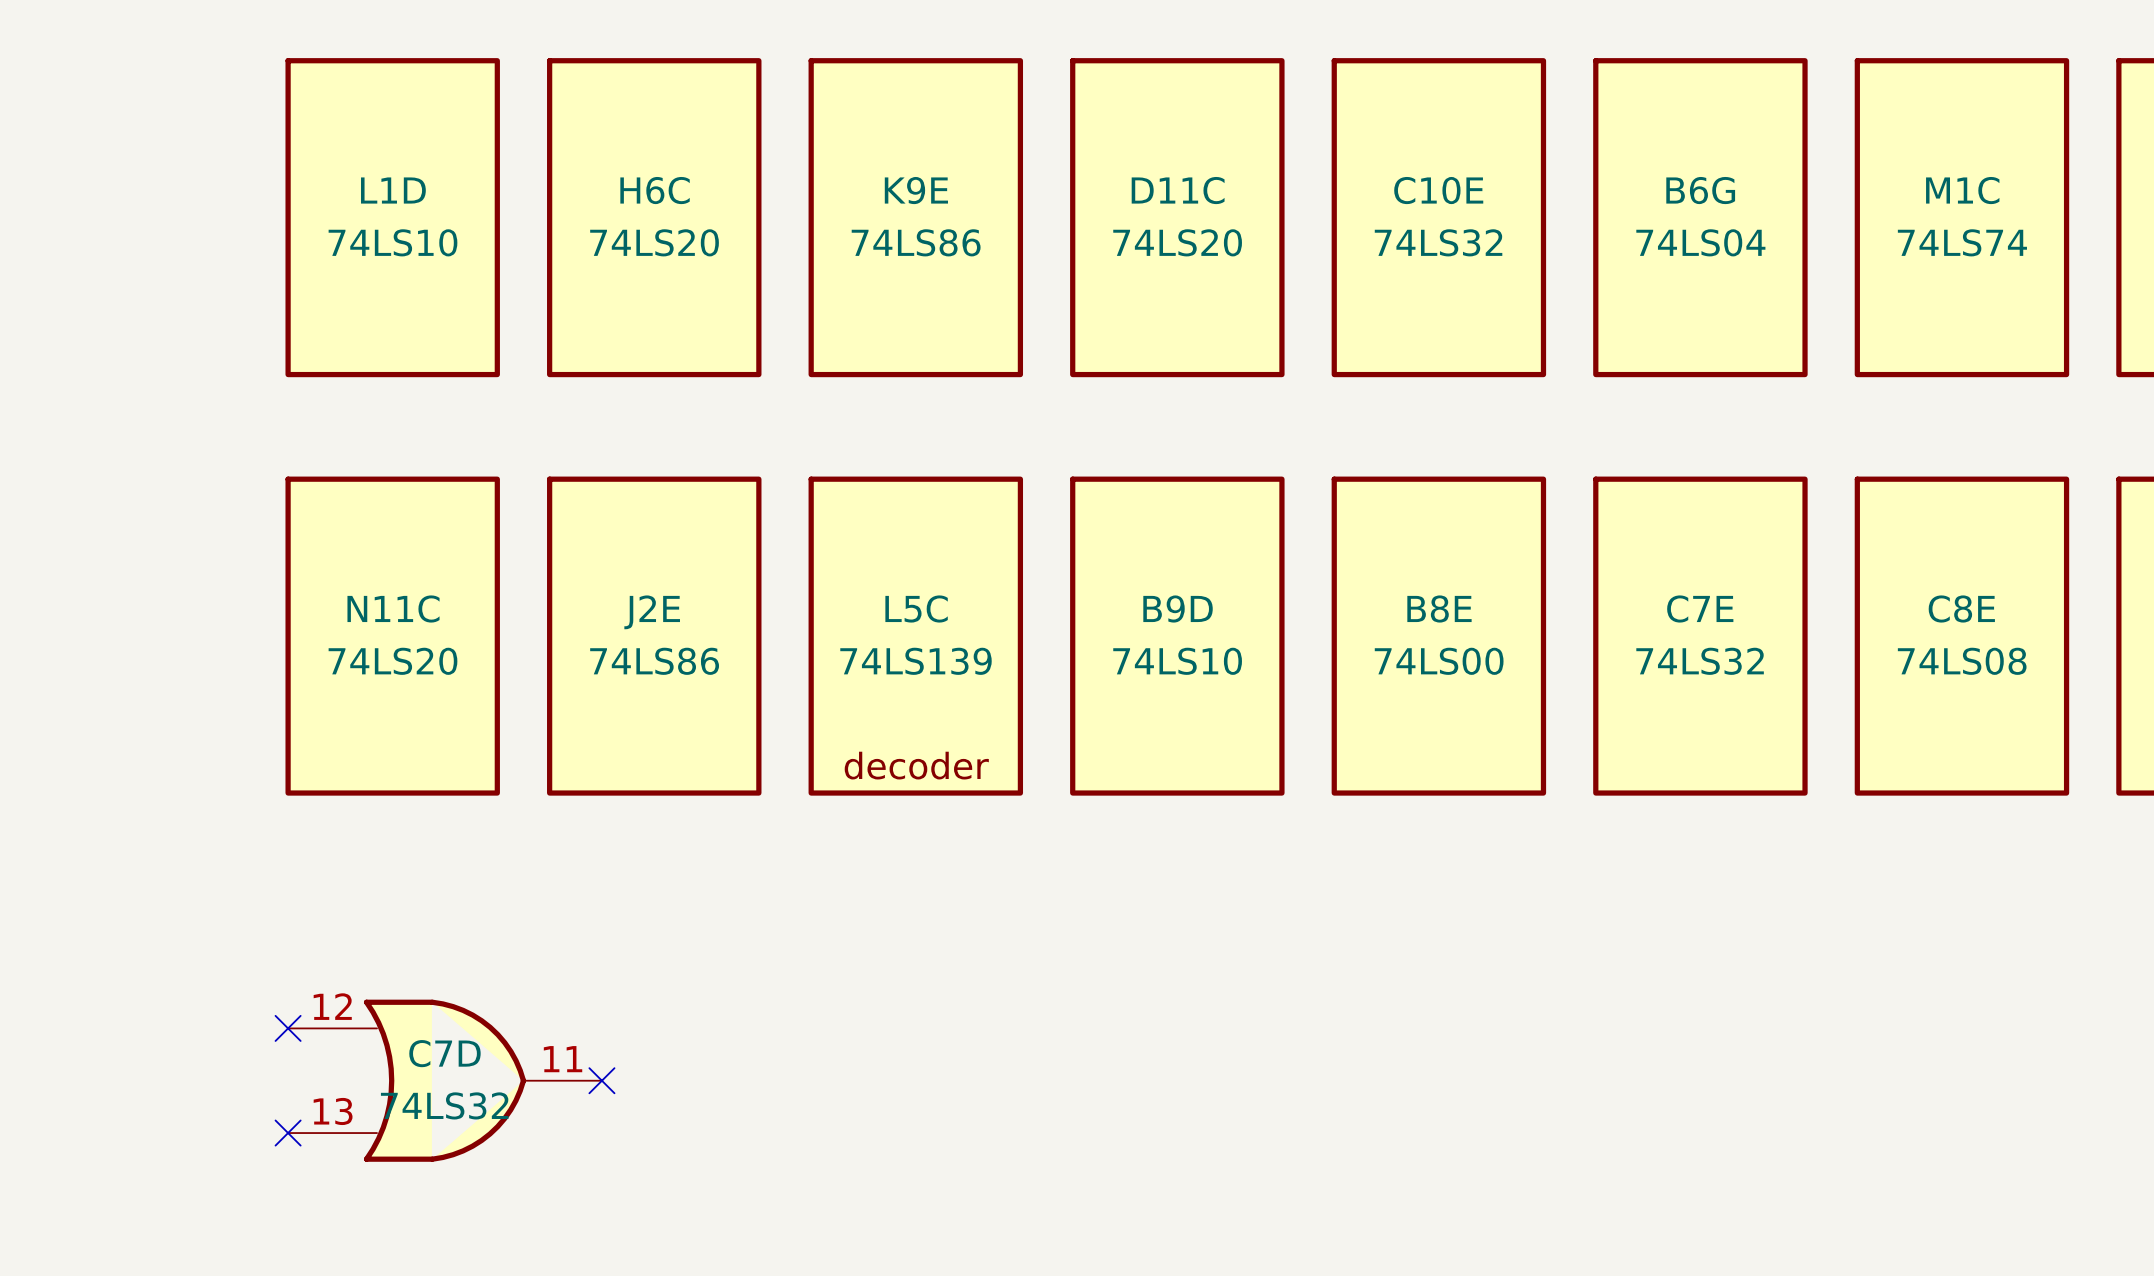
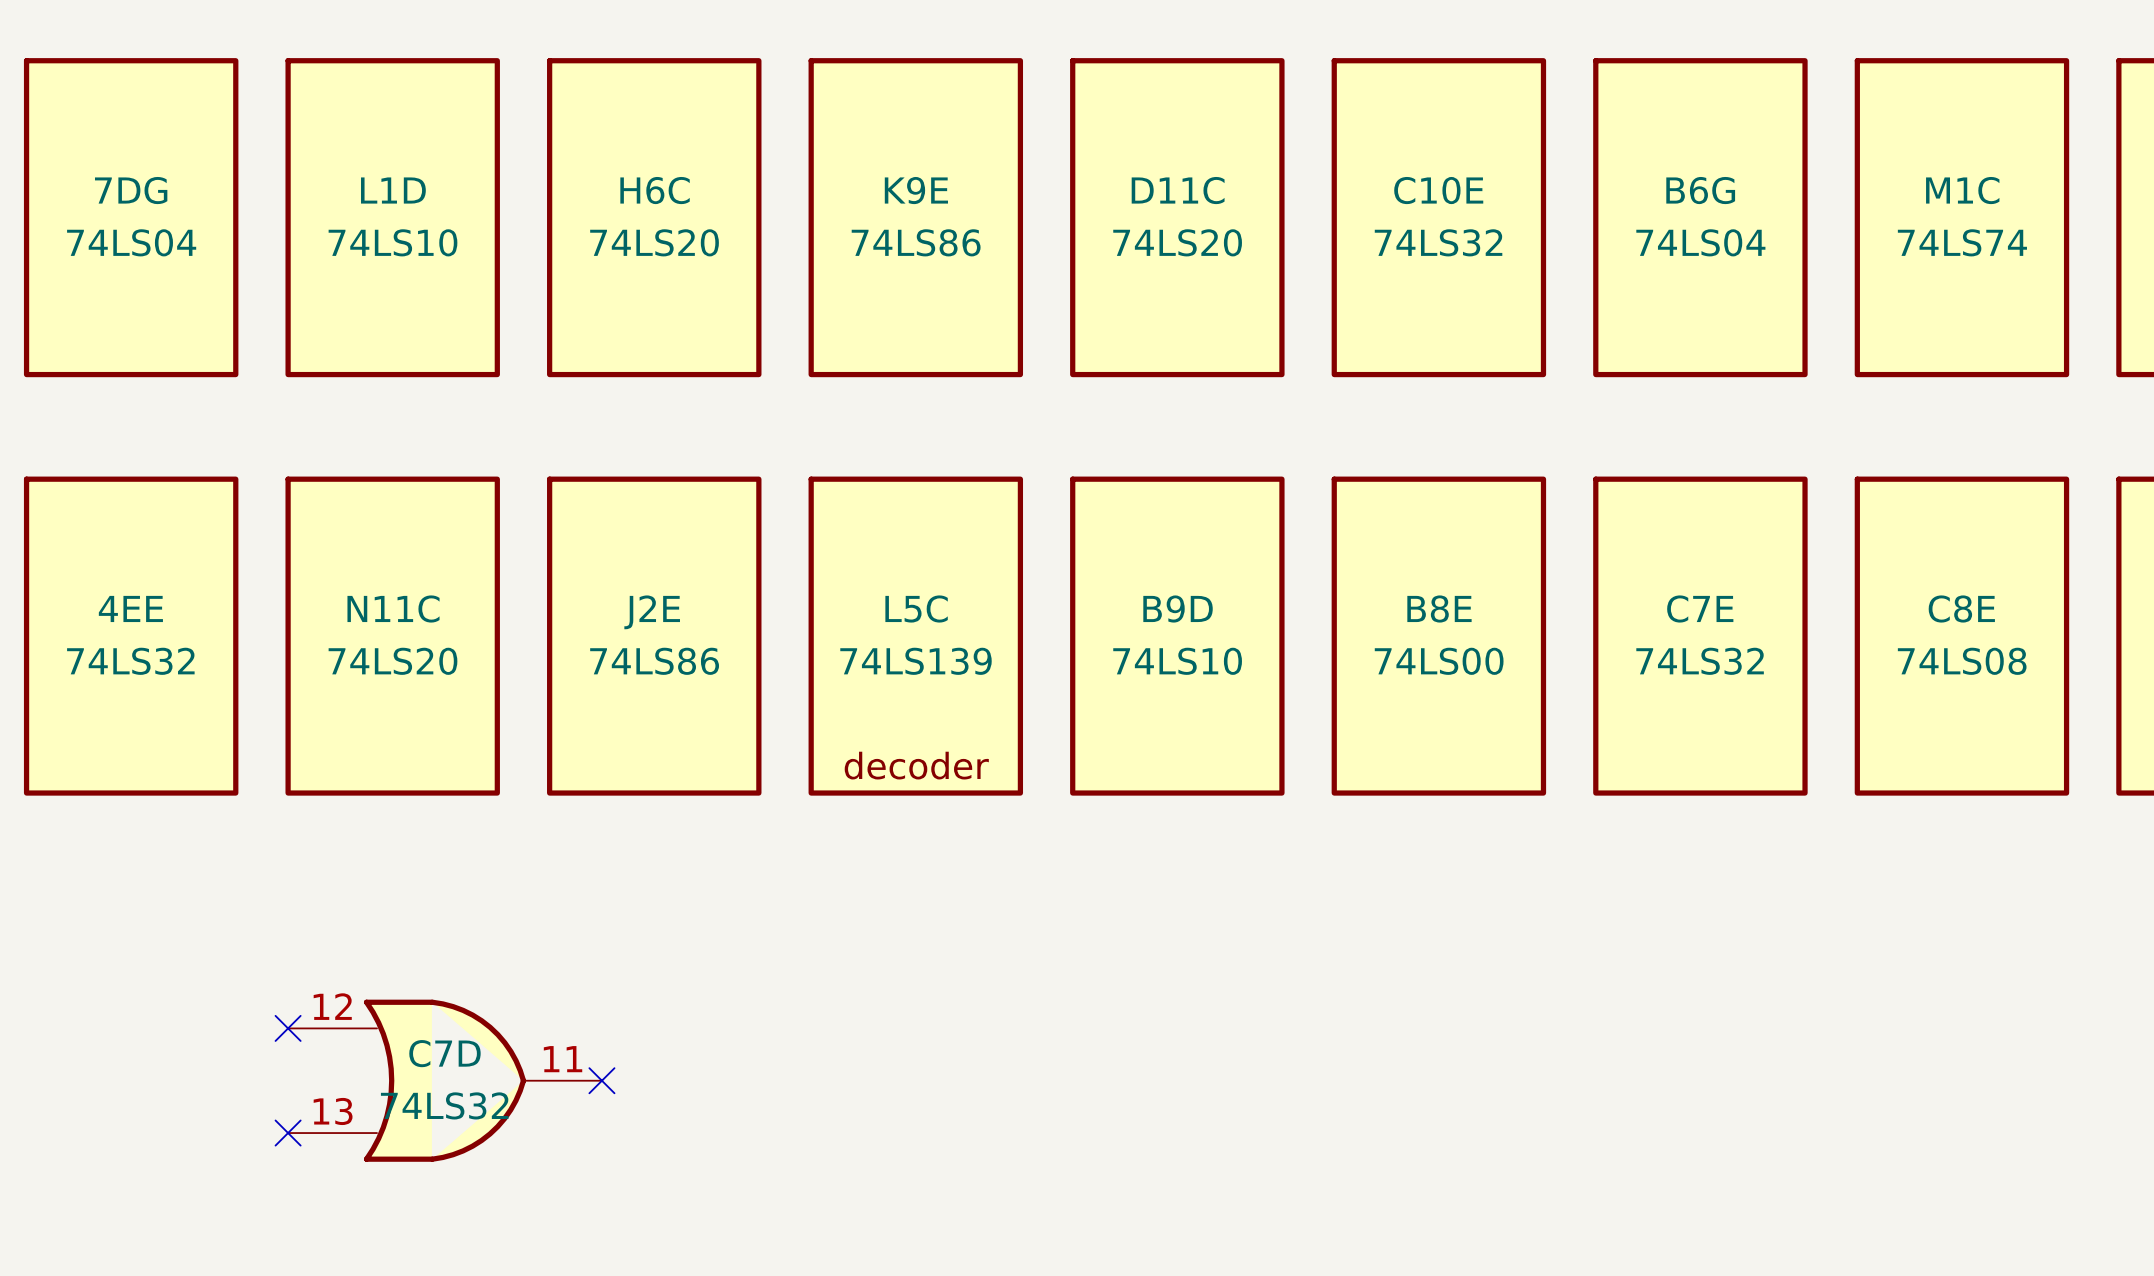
7DG: none -> 74LS04 (131, 217)
4EE: none -> 74LS32 (131, 636)

